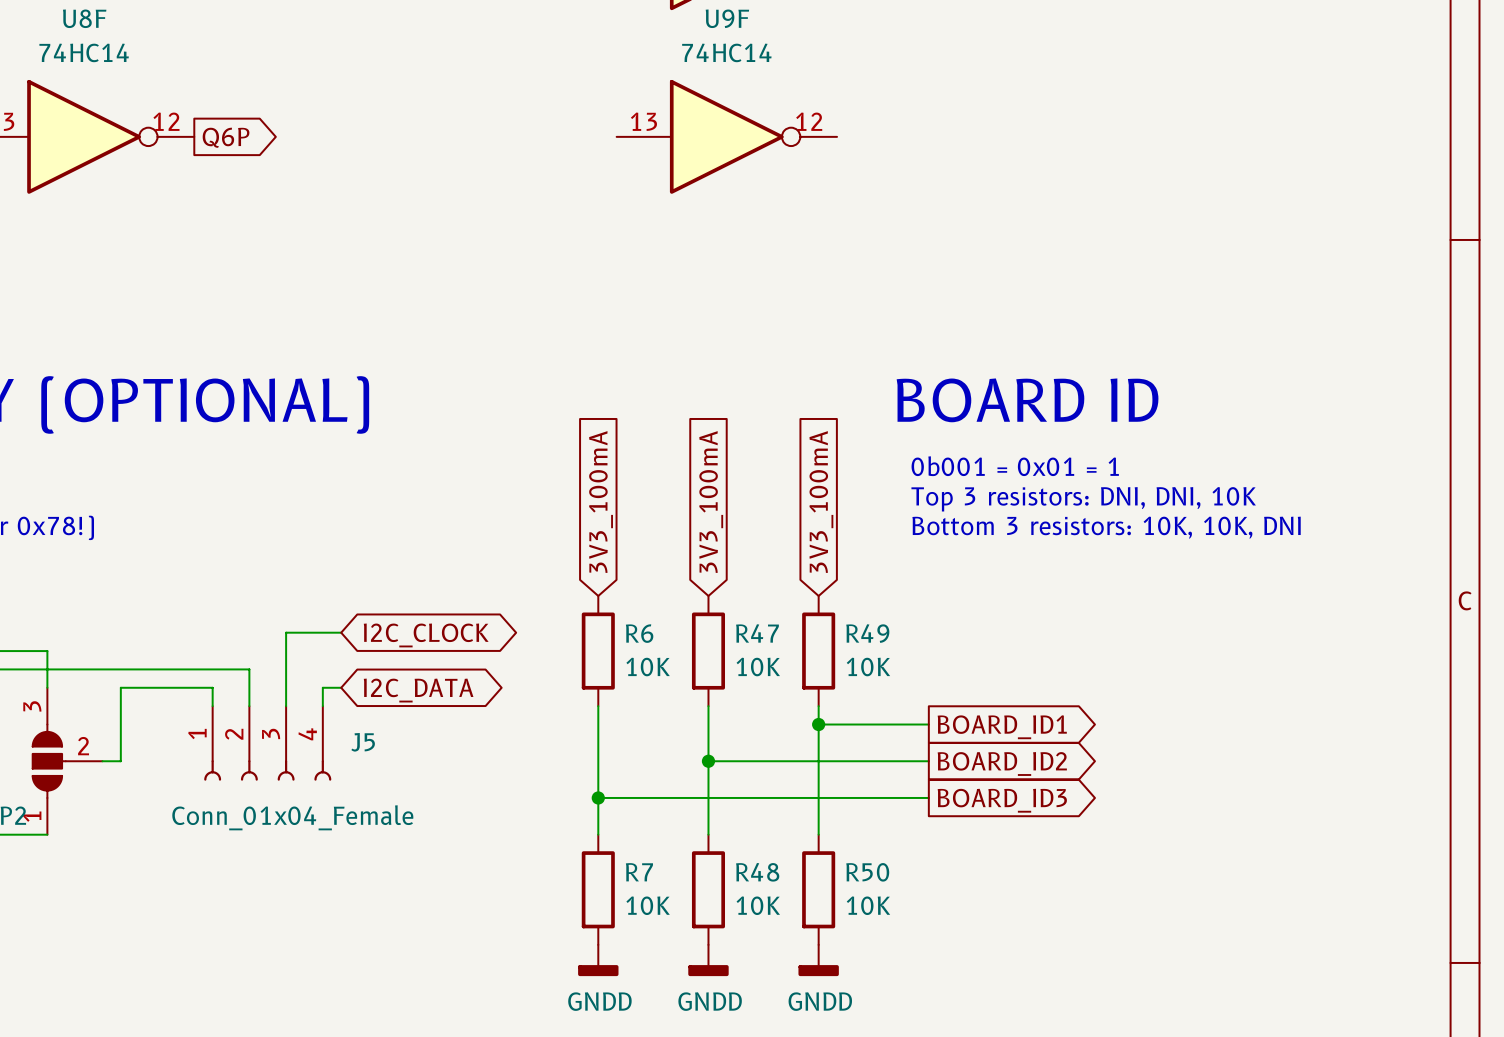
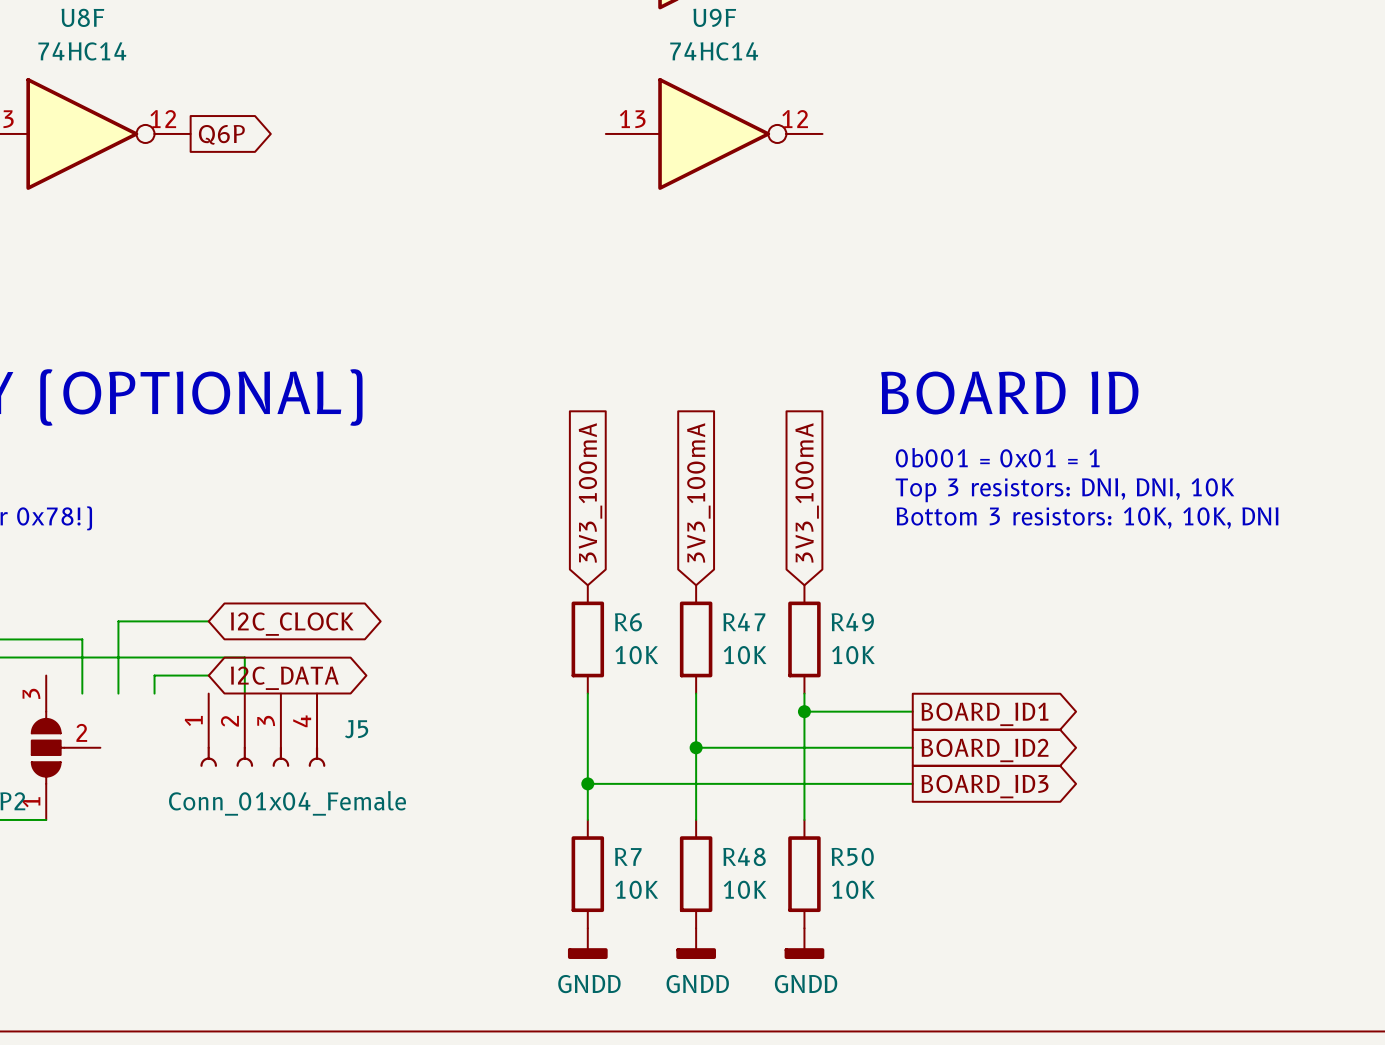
wire: none -> (208, 621) (118, 621) (118, 675)
wire: (341, 632) (286, 632) (286, 706) -> none
global label position: I2C_CLOCK (426, 635) -> I2C_CLOCK (292, 624)
wire: (47, 651) (47, 687) -> (46, 639) (82, 639) (82, 693)
wire: (120, 687) (157, 687) -> (154, 693) (154, 675)
wire: (212, 687) (212, 706) -> none
wire: (341, 687) (322, 687) (322, 706) -> none
global label position: I2C_DATA (418, 690) -> I2C_DATA (284, 678)
wire: (120, 706) (120, 761) (102, 761) -> none

